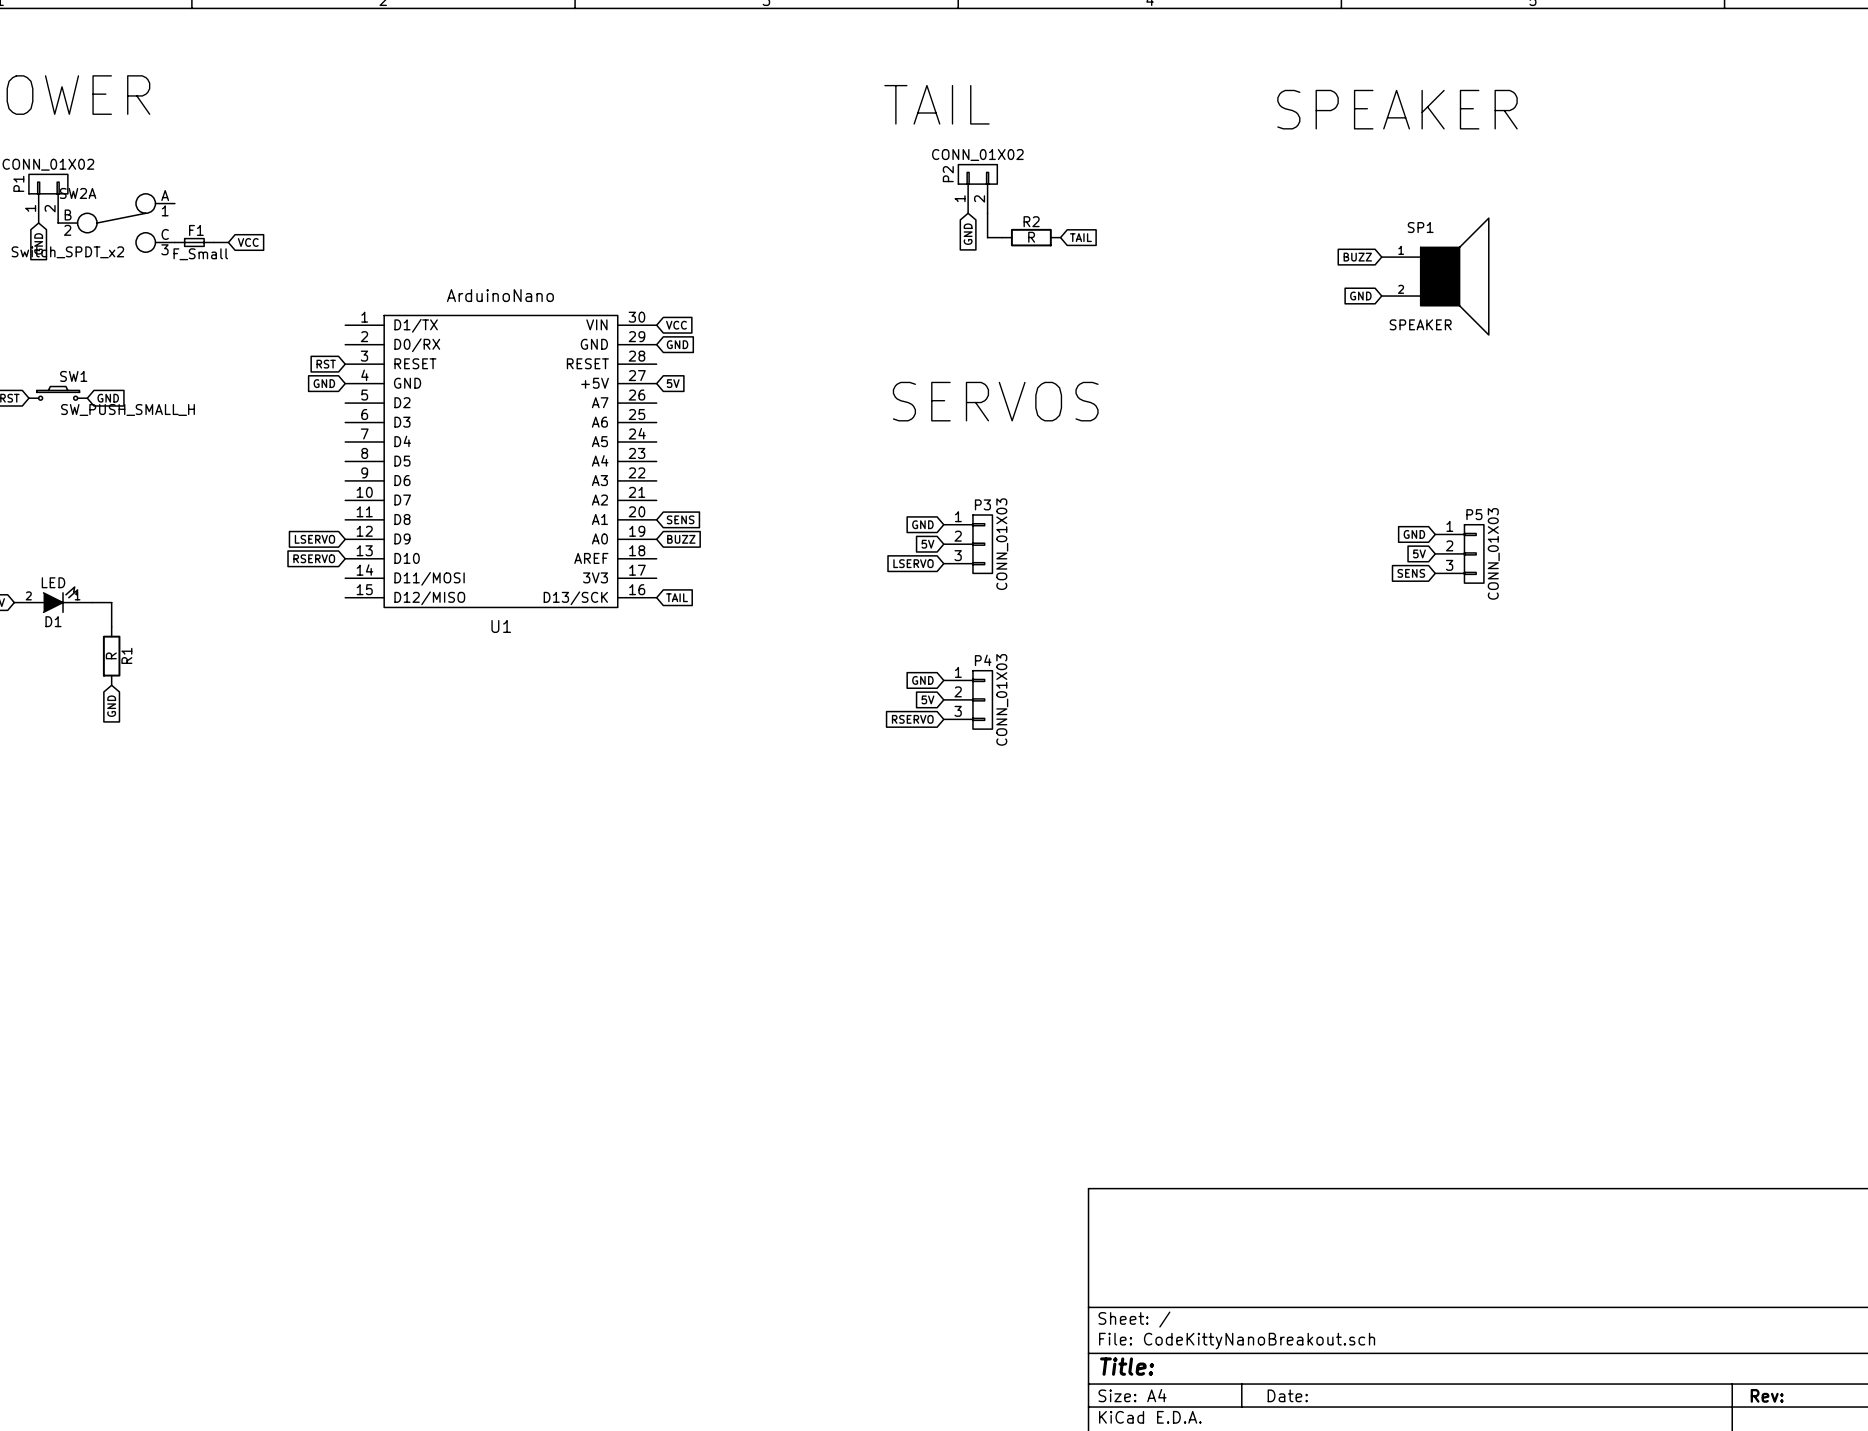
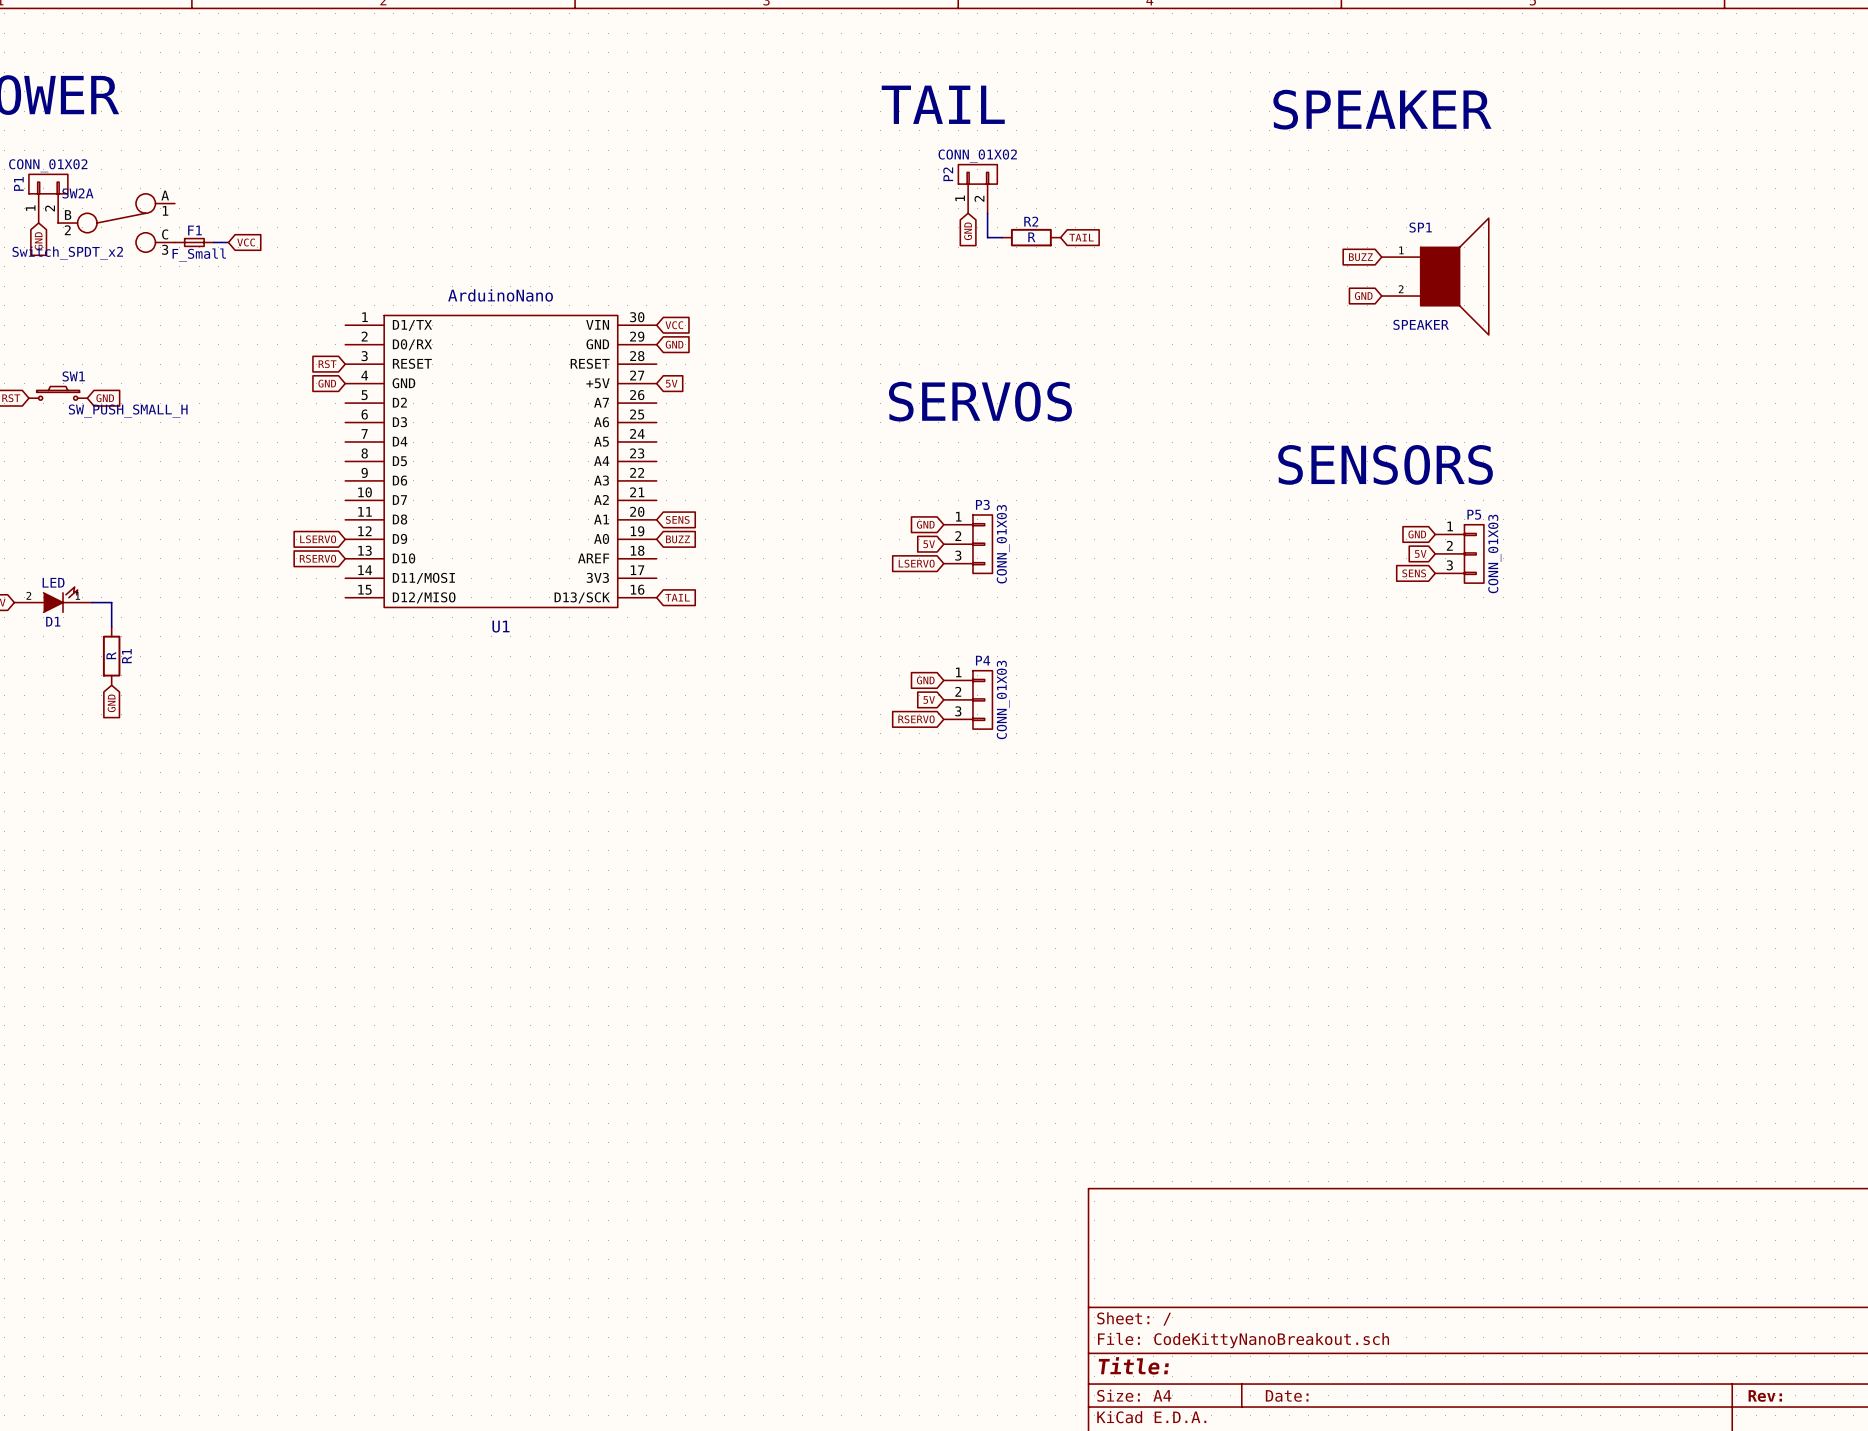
text: none -> SENSORS (1385, 464)

